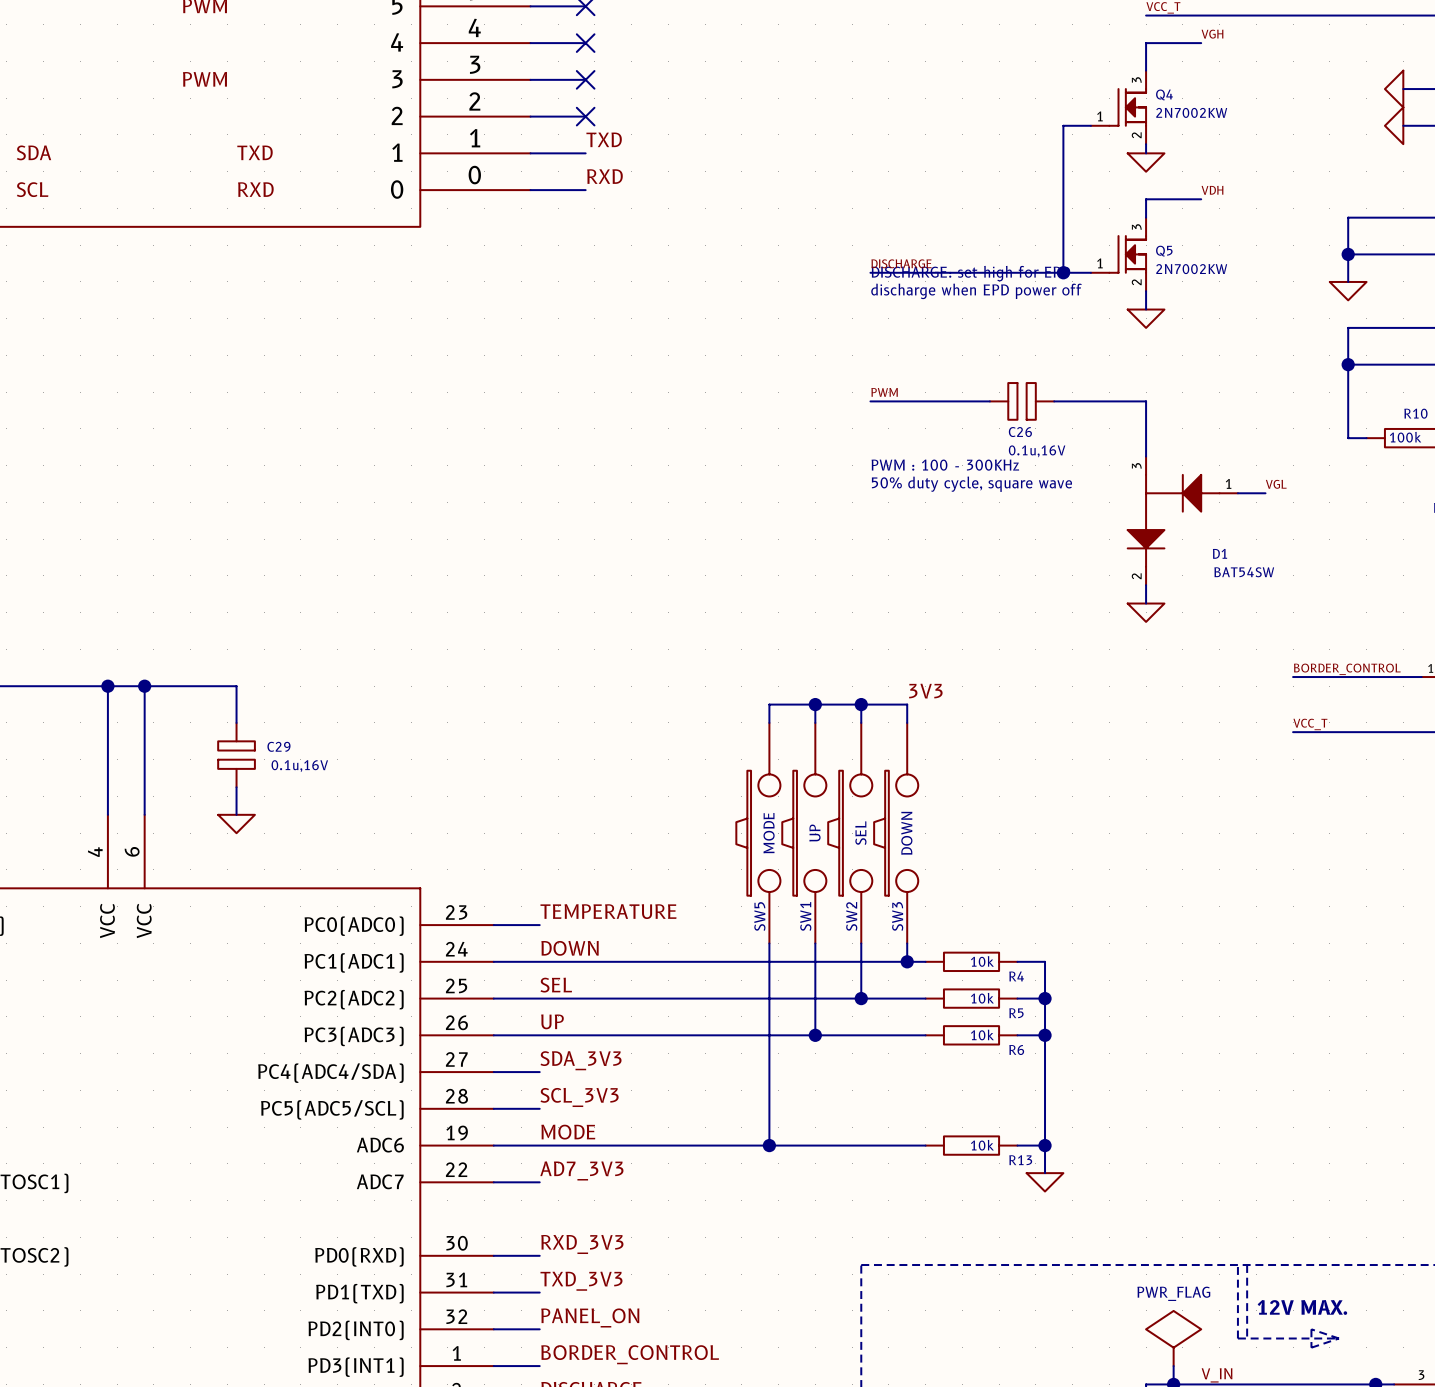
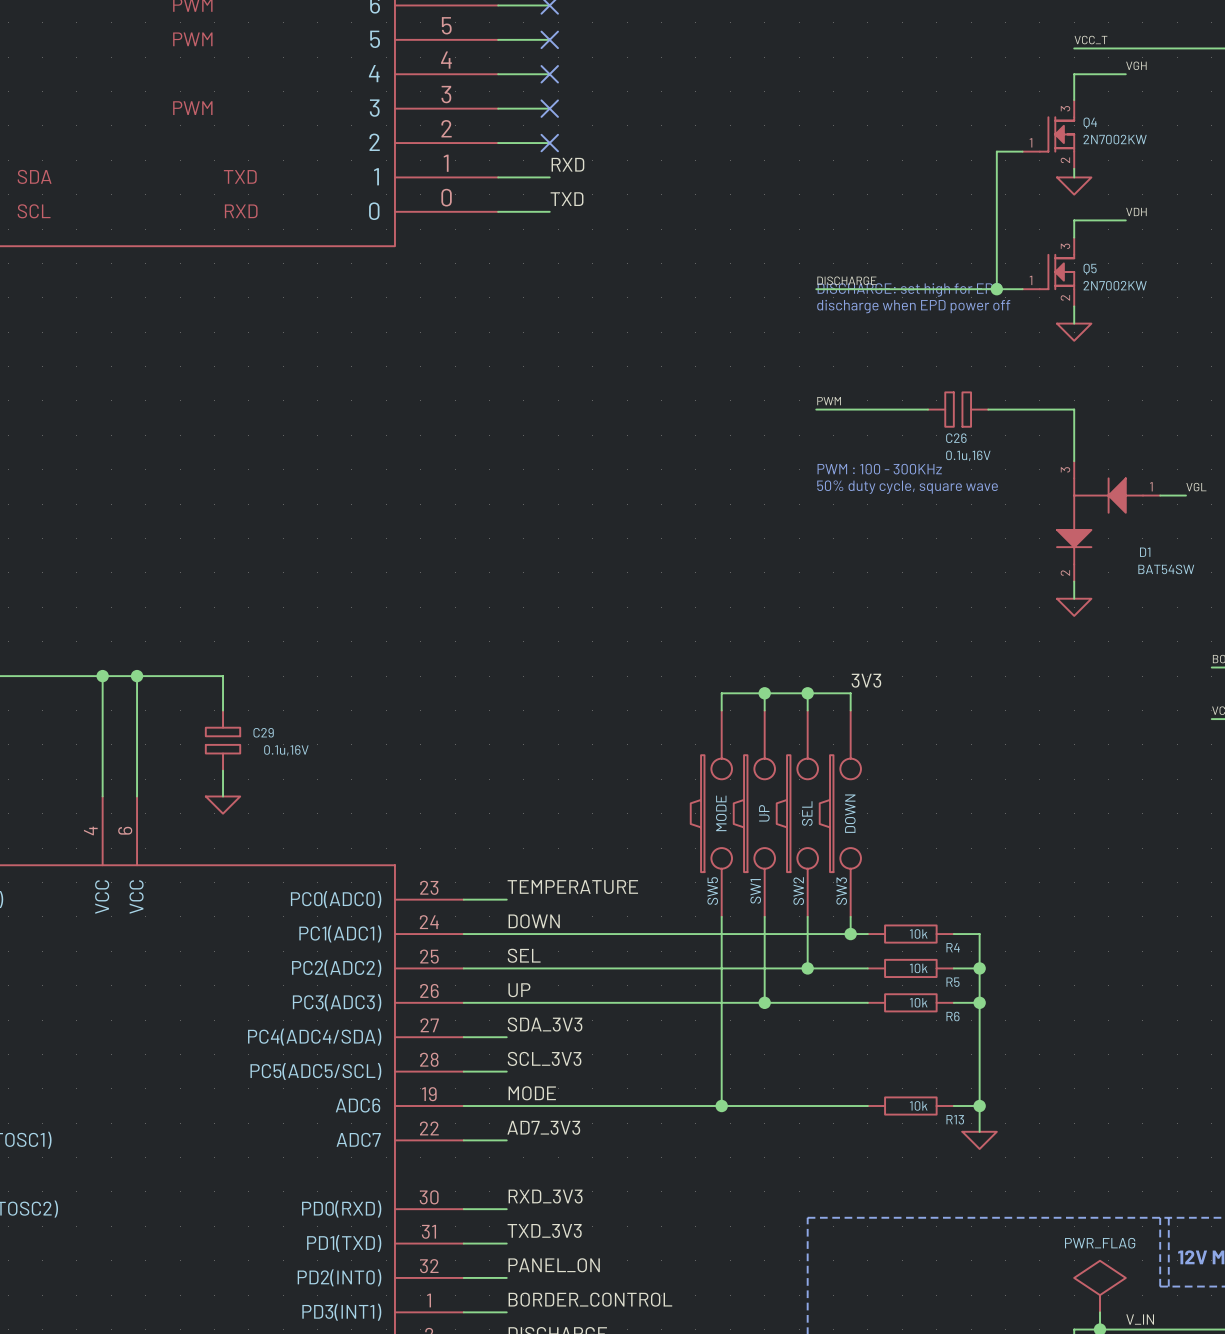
label: TXD (604, 139) -> RXD (567, 164)
label: RXD (604, 176) -> TXD (567, 199)

